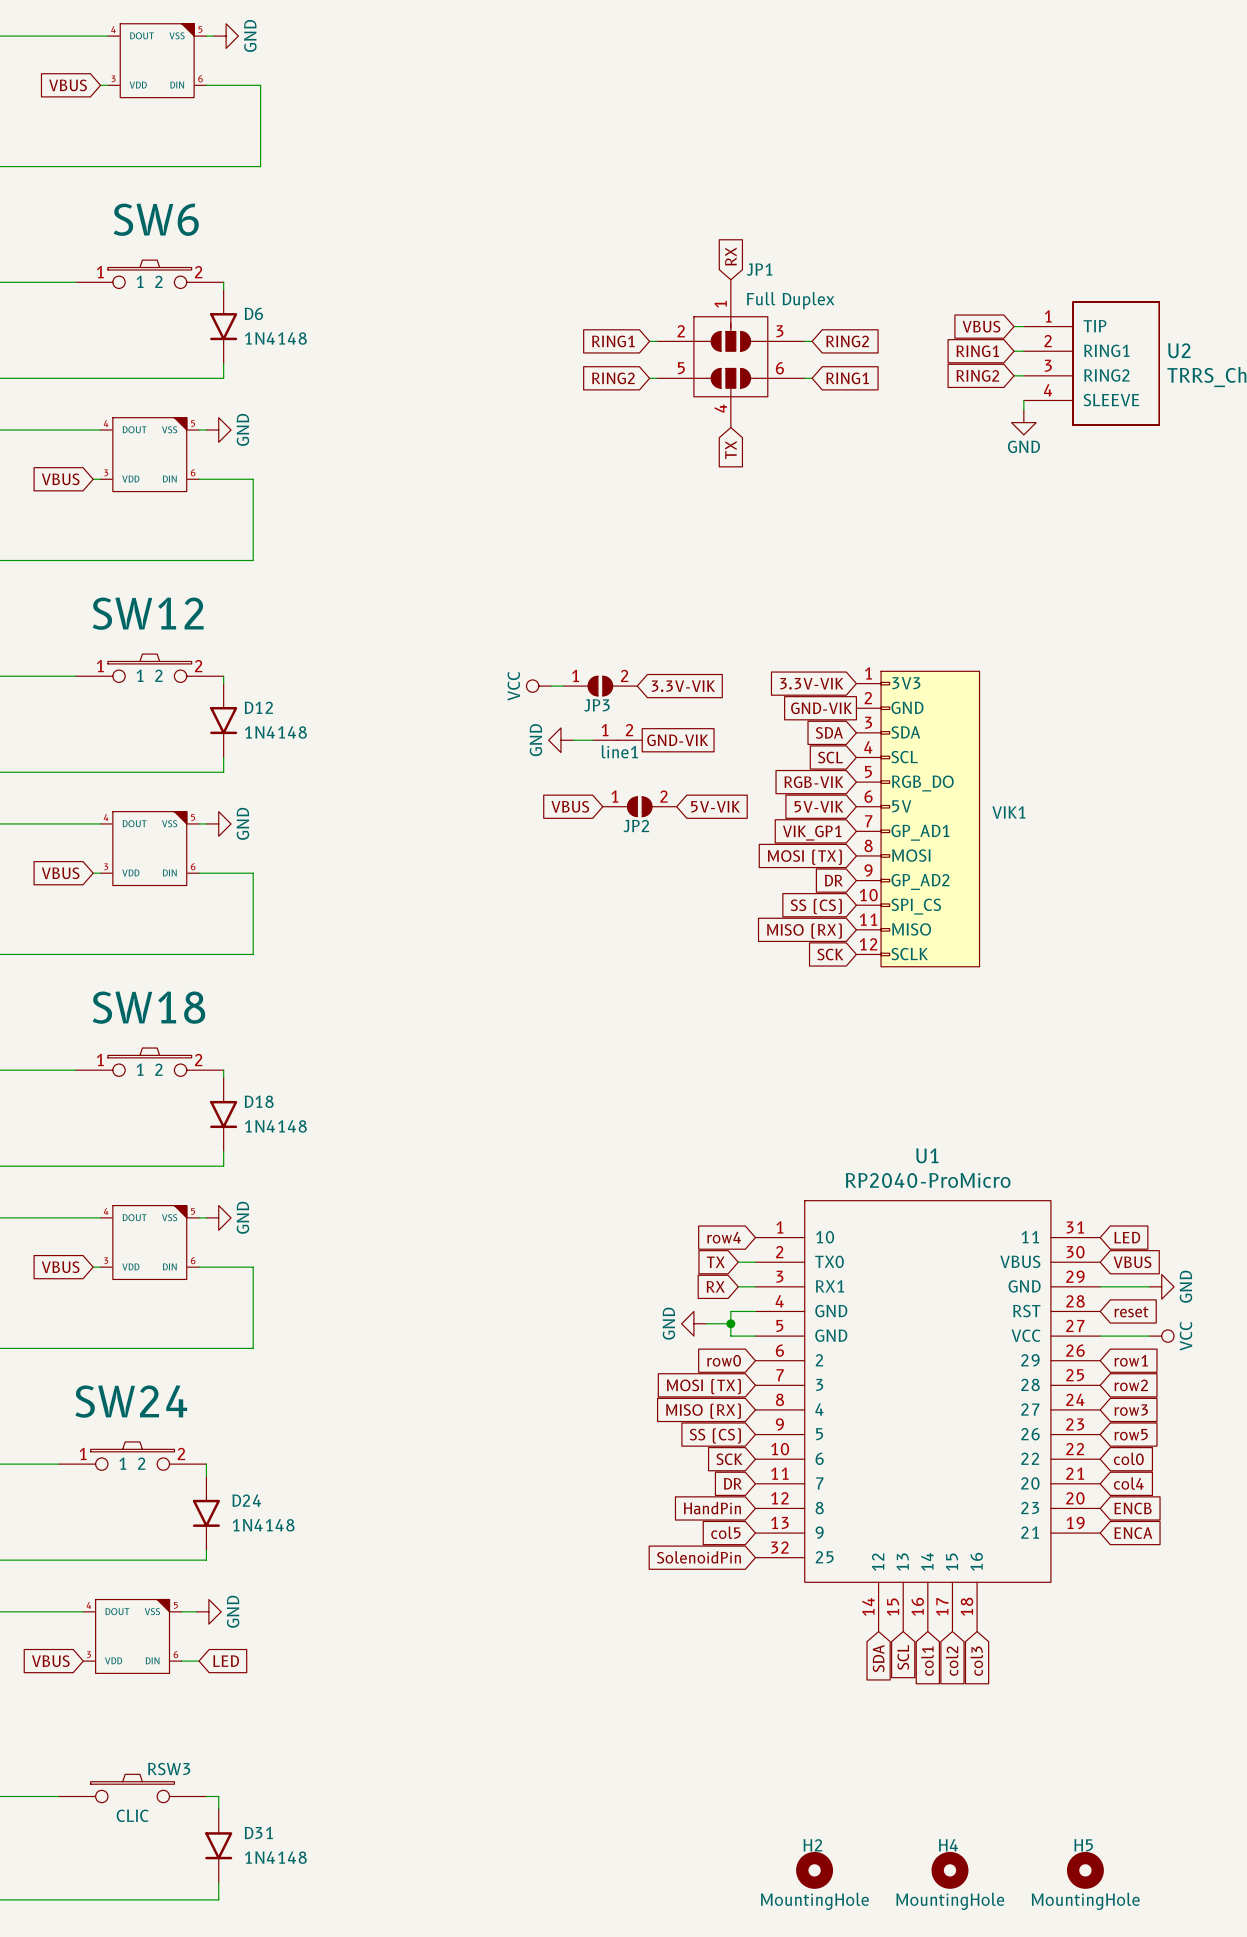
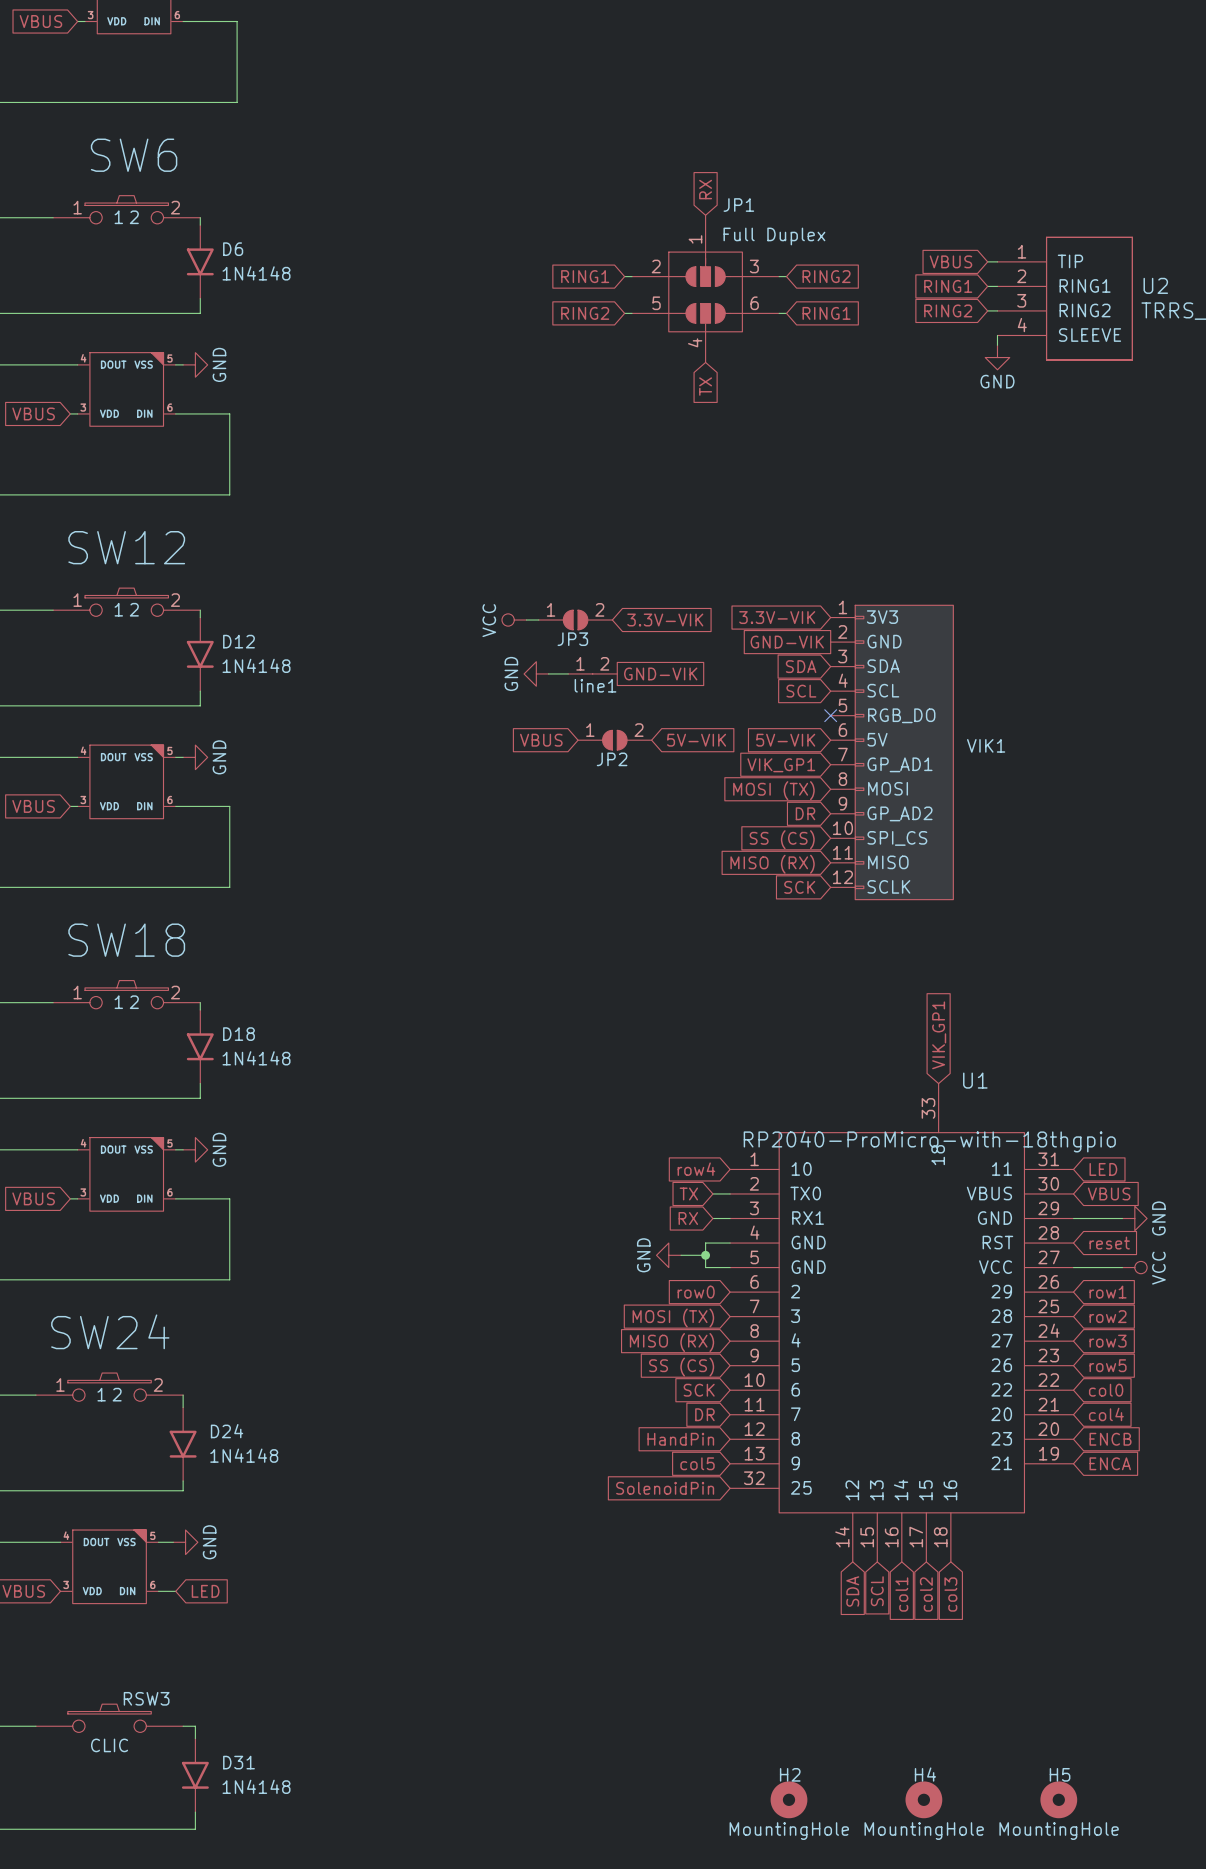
global label: RGB-VIK (813, 782) -> none
no-connect mark: none -> (830, 715)
global label: none -> VIK_GP1 (939, 1035)
U1 name position: U1 (927, 1155) -> U1 (975, 1080)
U1 value: RP2040-ProMicro (928, 1180) -> RP2040-ProMicro-with-18thgpio (929, 1141)
U1 symbol: [755, 1200, 1101, 1632] -> [730, 1083, 1074, 1562]

